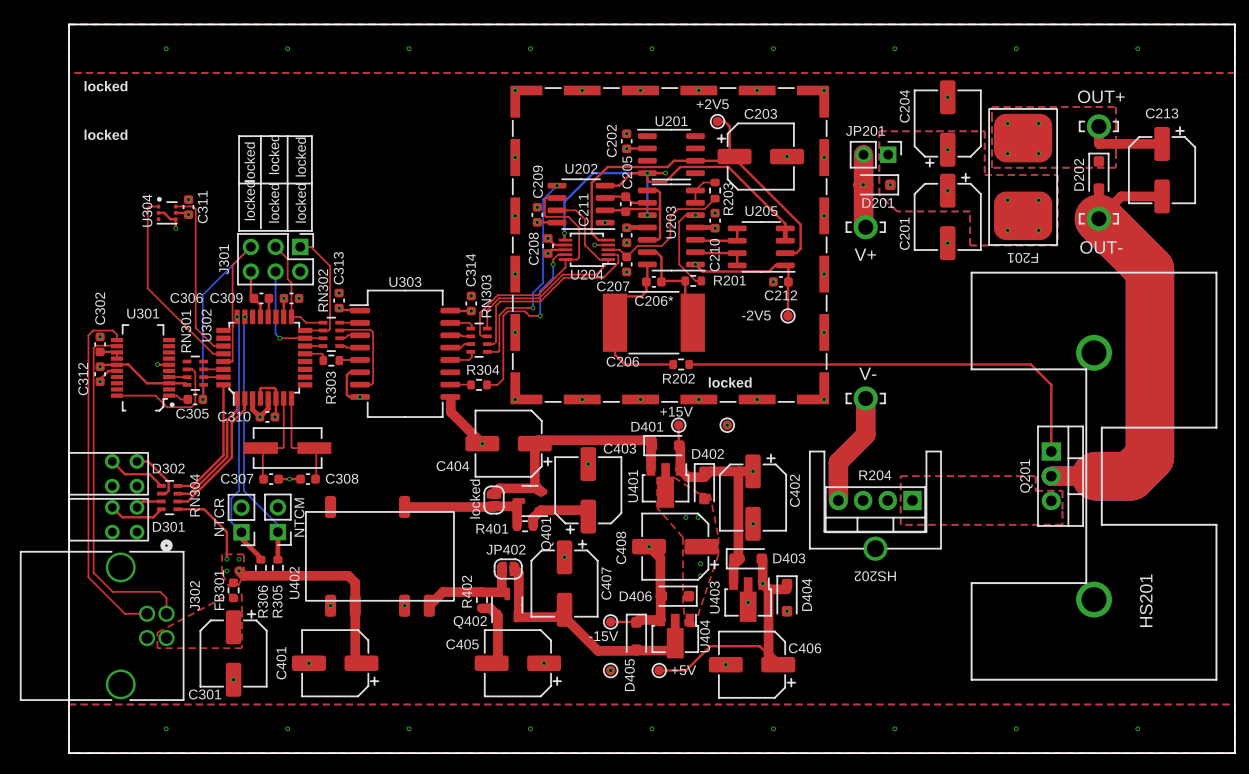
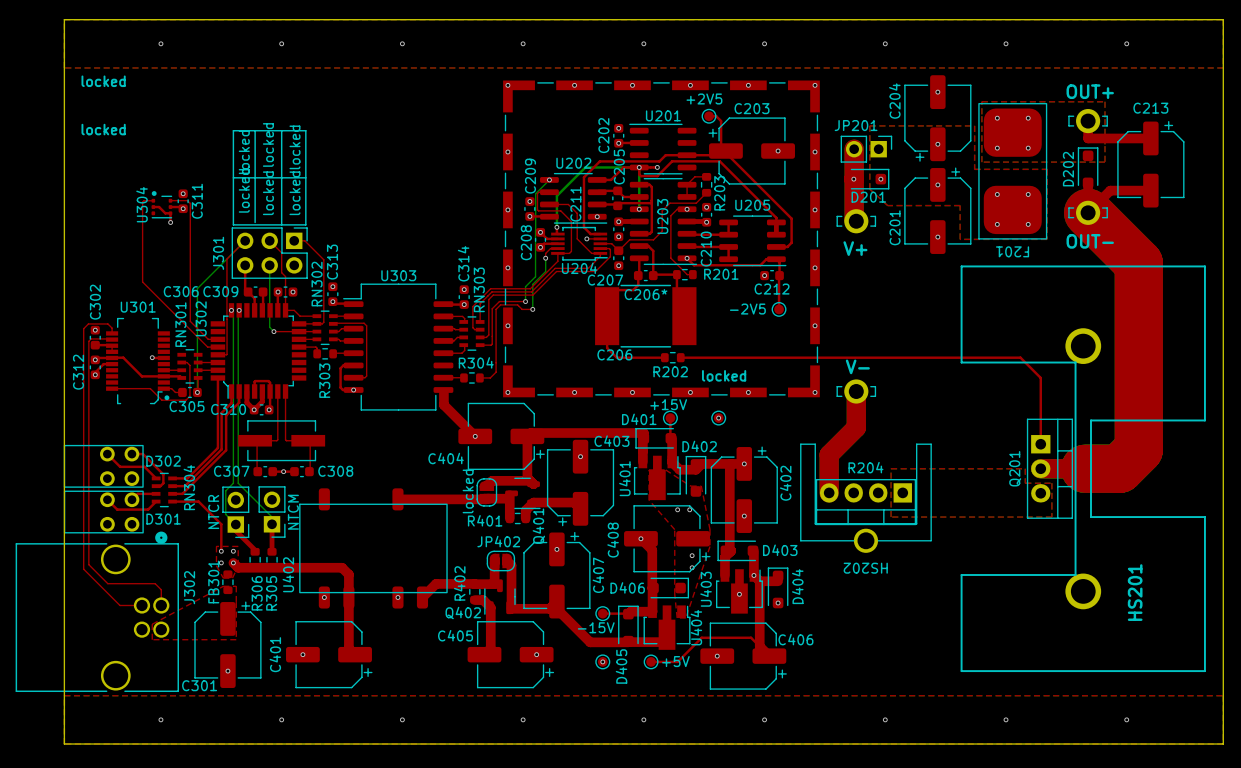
text: NTCR (219, 517) -> none
text: NTCM (299, 517) -> none
NTCR name: none -> NTCR (213, 511)
NTCM name: none -> NTCM (293, 512)

